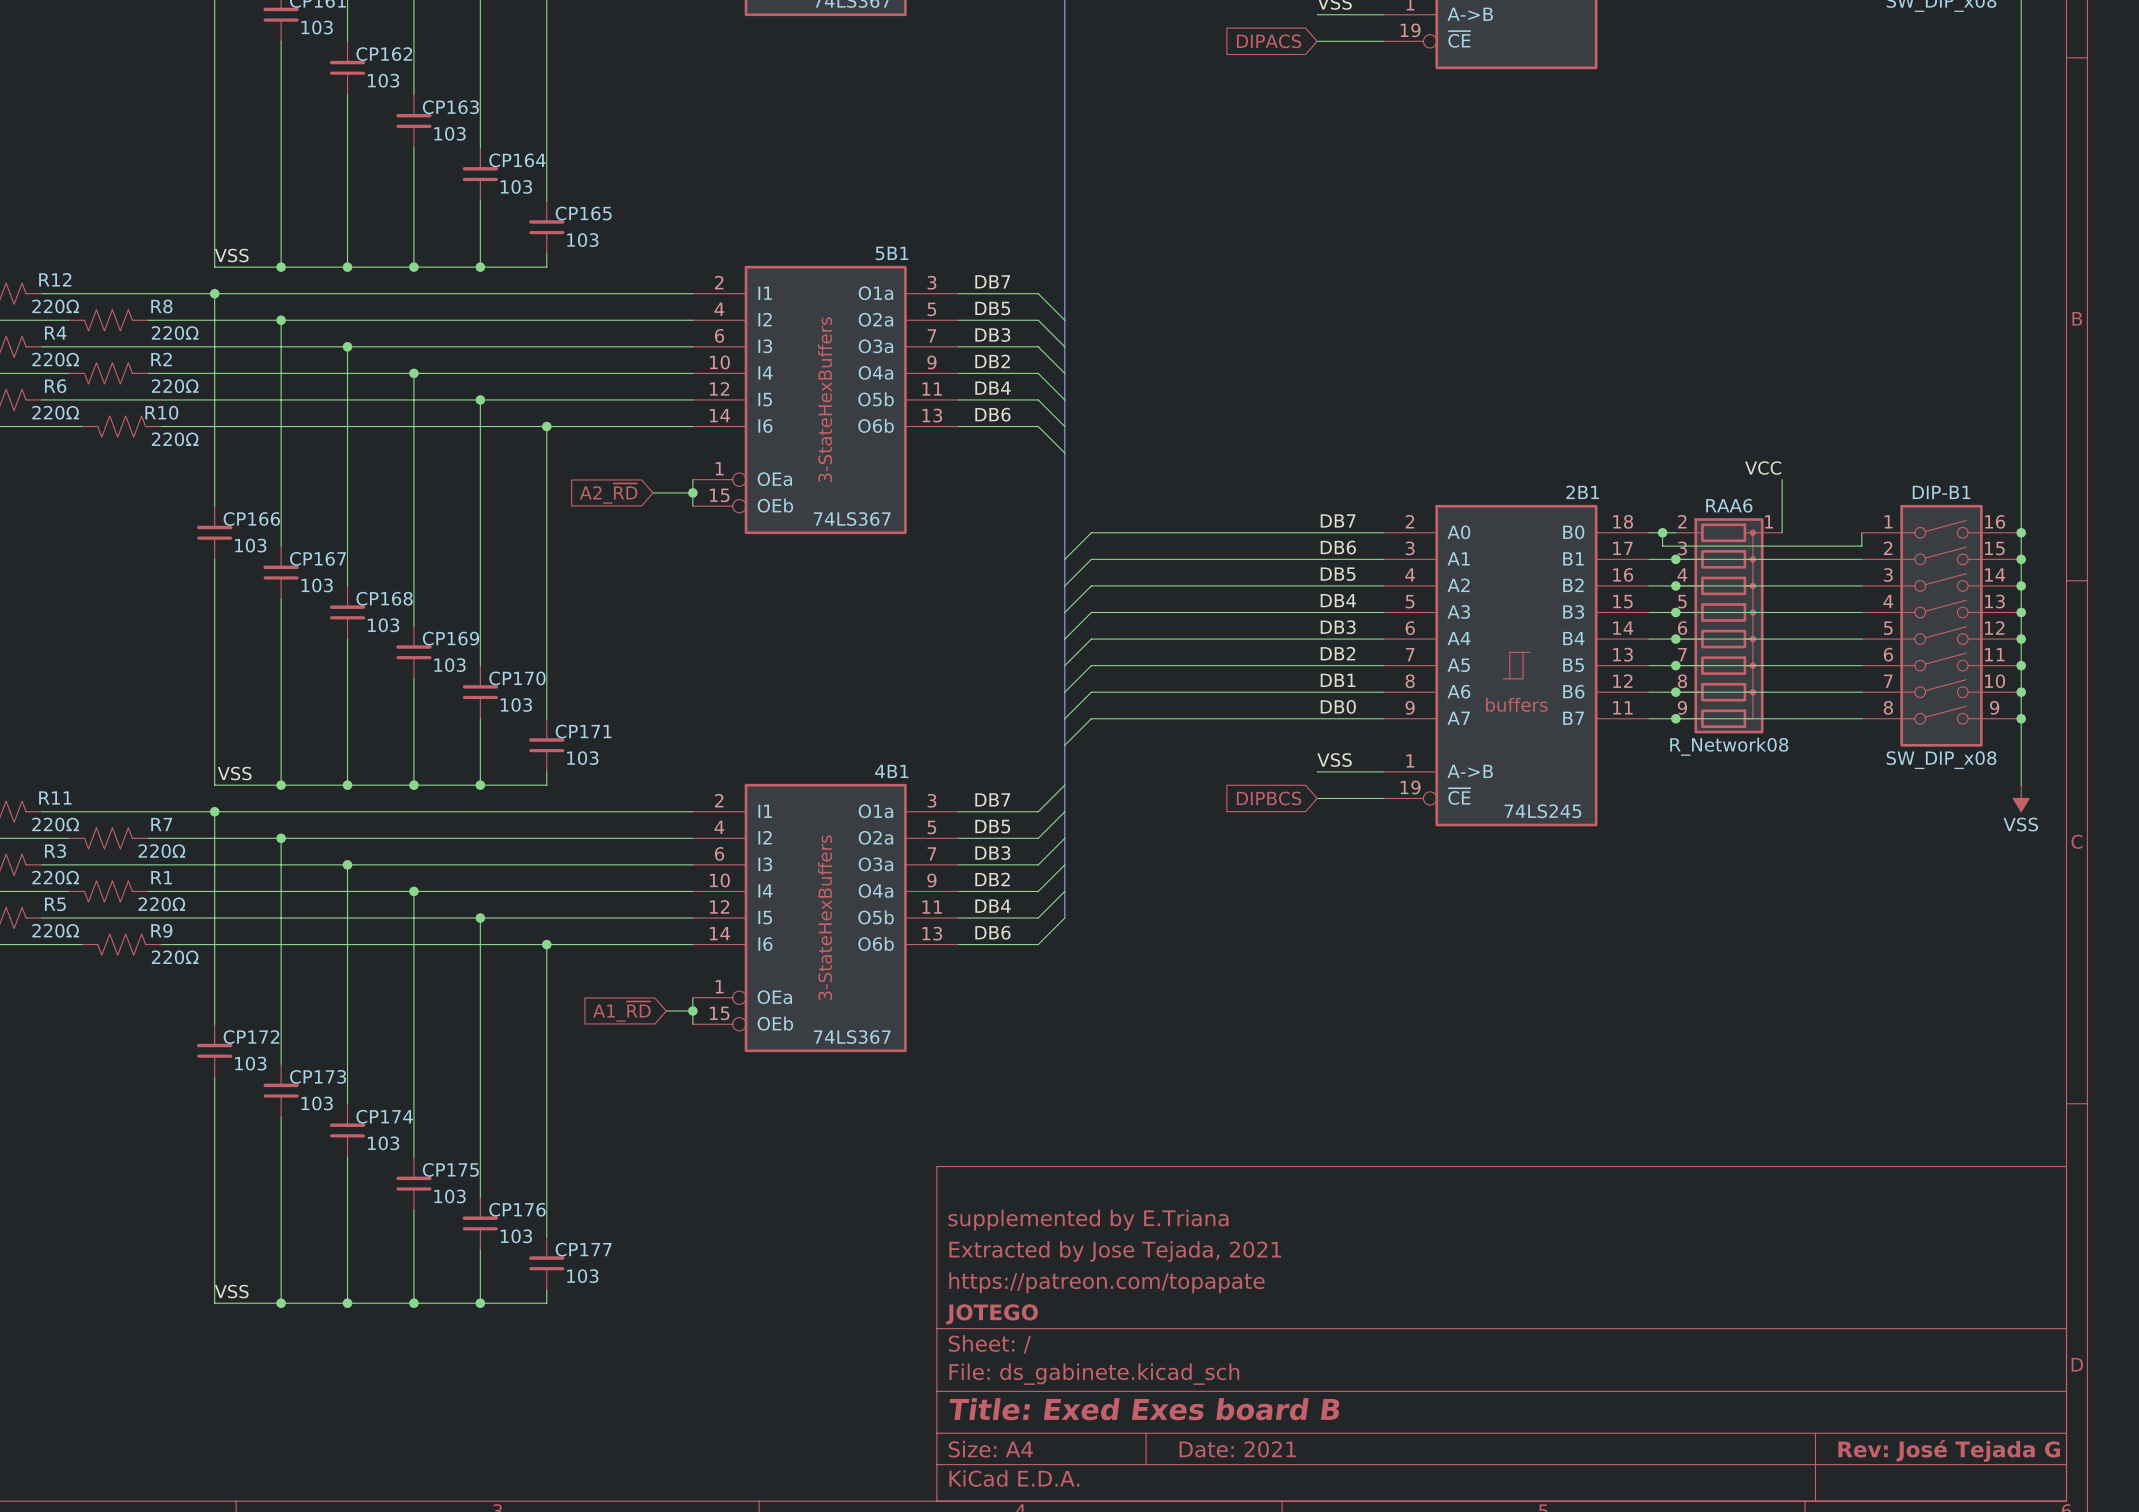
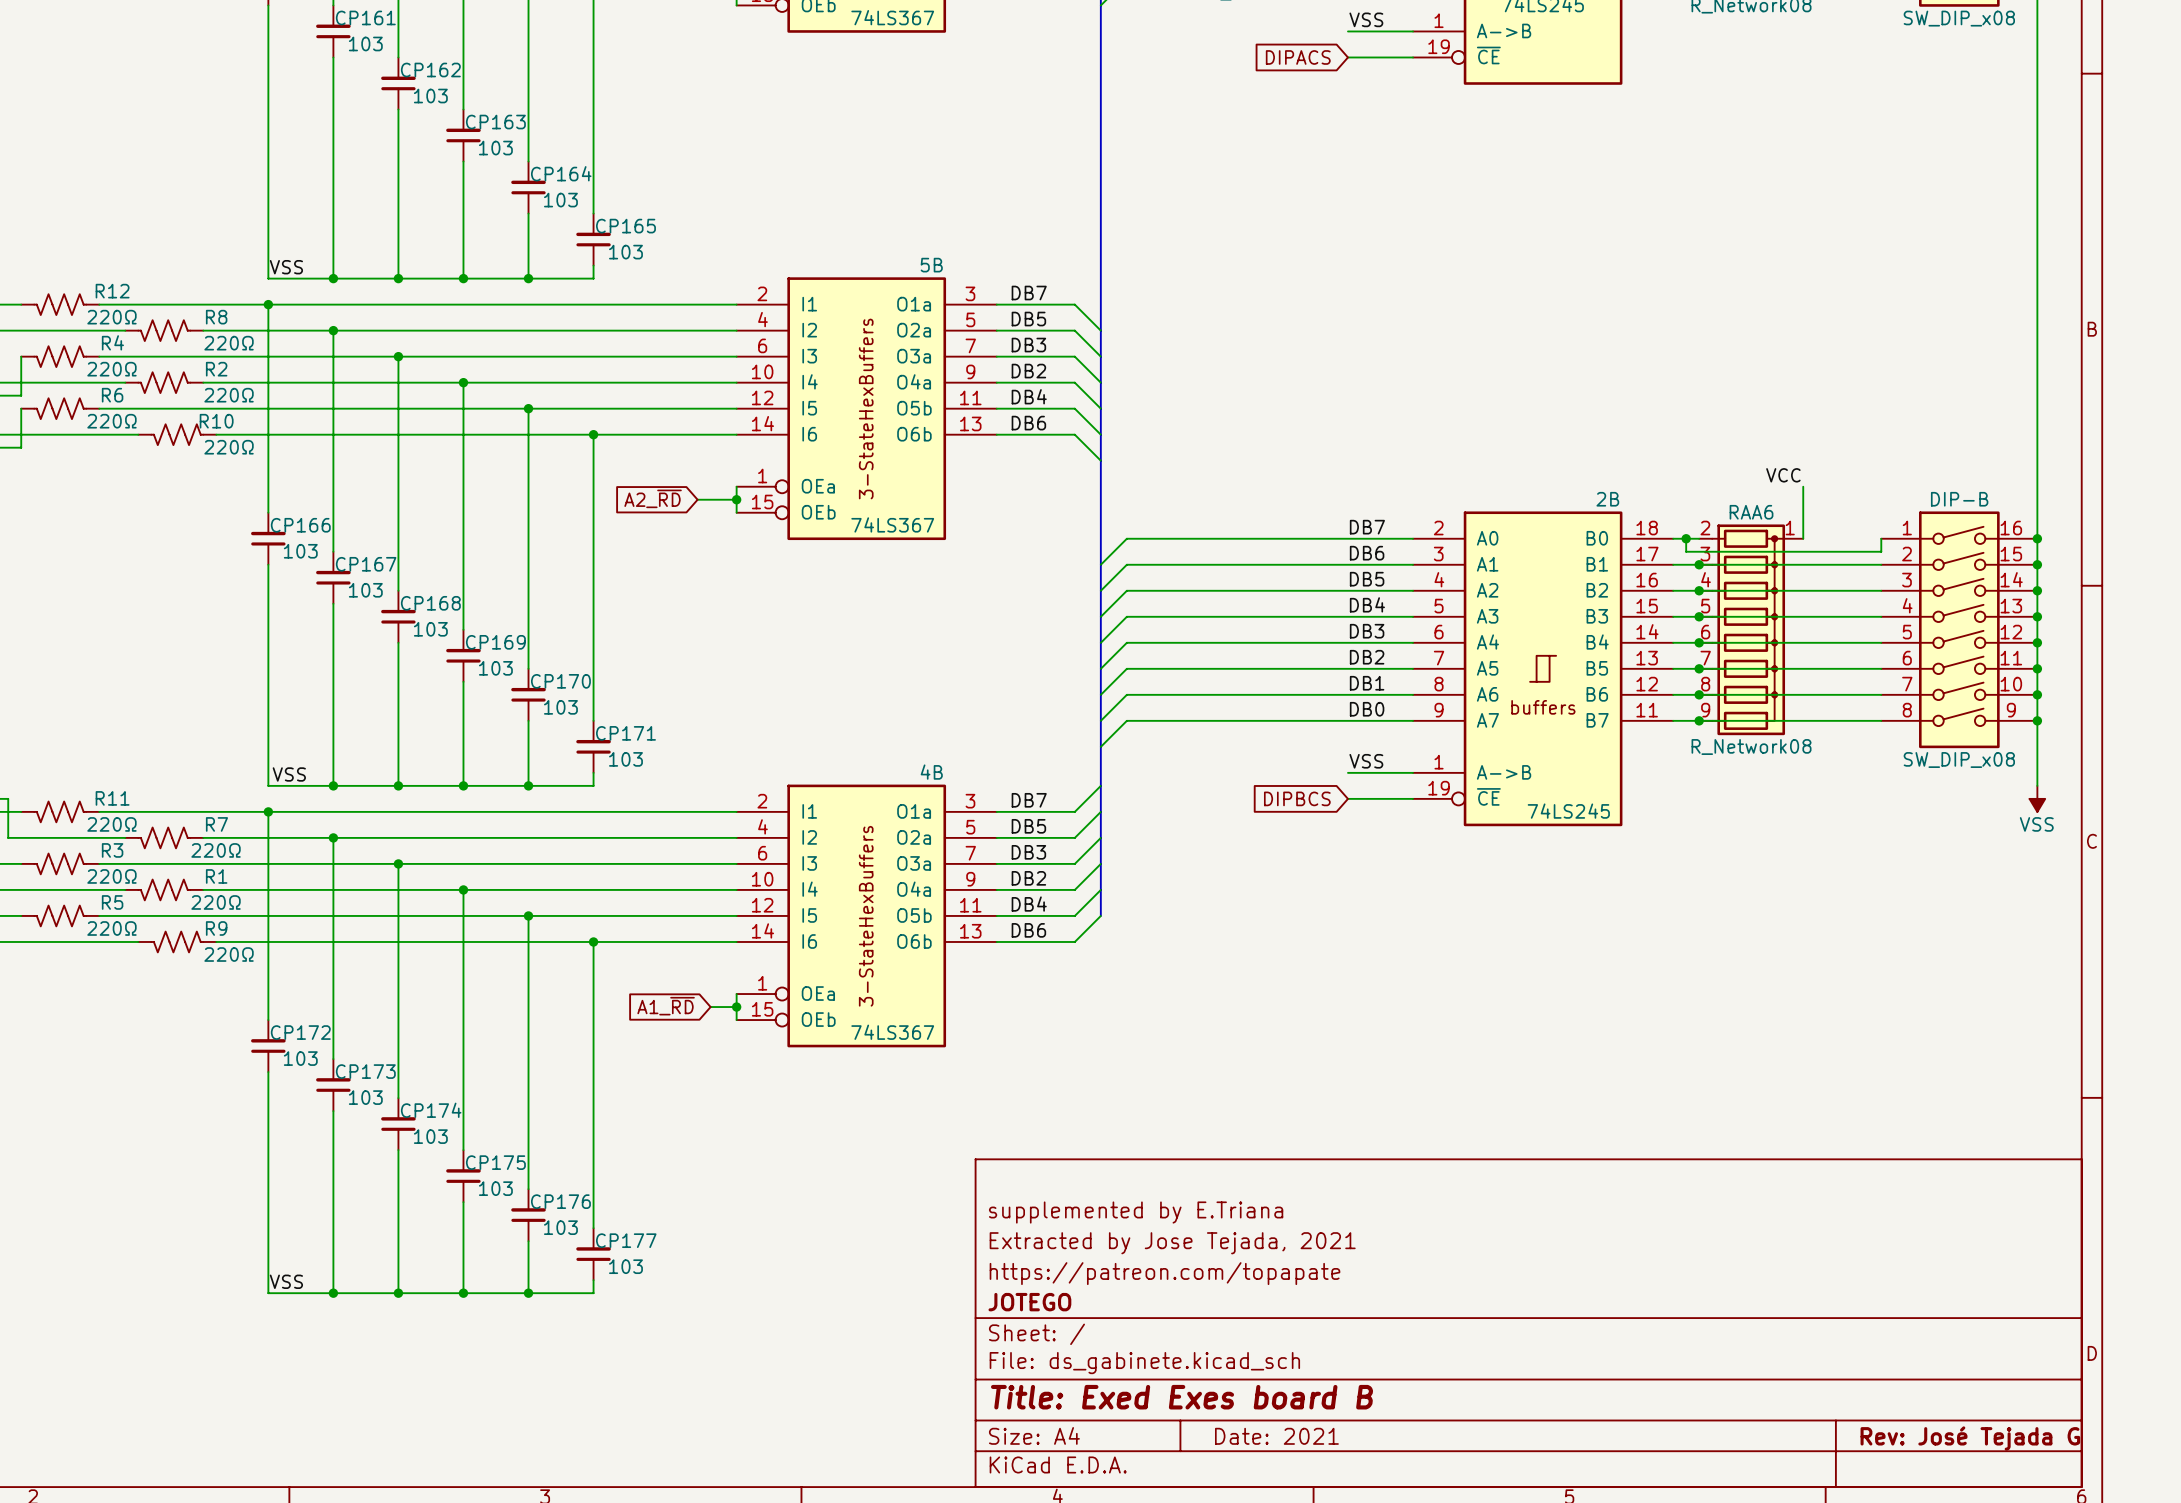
5B1 name: 5B1 (892, 253) -> 5B (931, 265)
2B1 name: 2B1 (1582, 492) -> 2B (1607, 499)
DIP-B1 name: DIP-B1 (1941, 492) -> DIP-B (1959, 499)
4B1 name: 4B1 (891, 771) -> 4B (931, 772)

